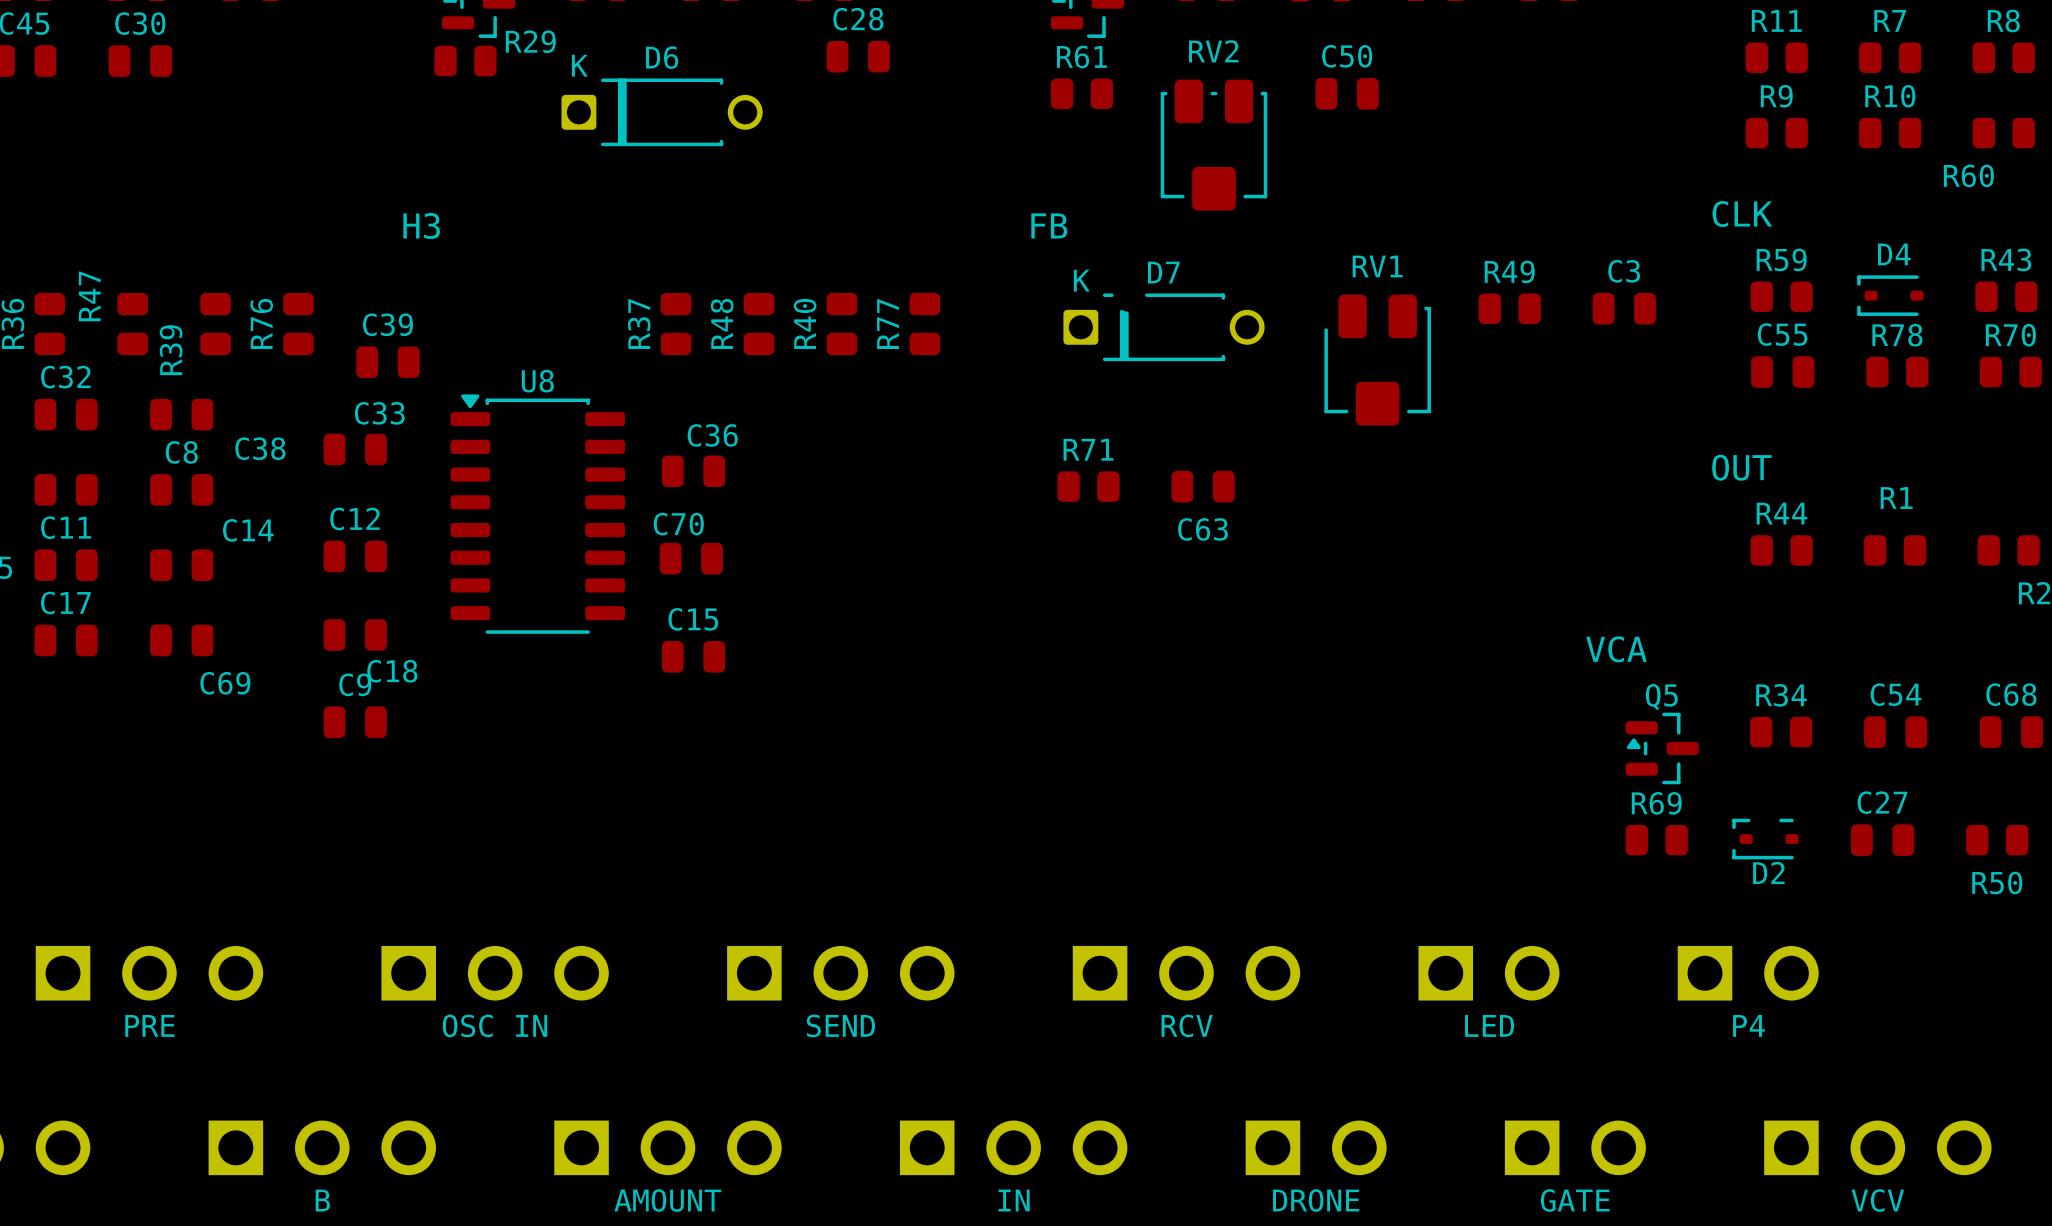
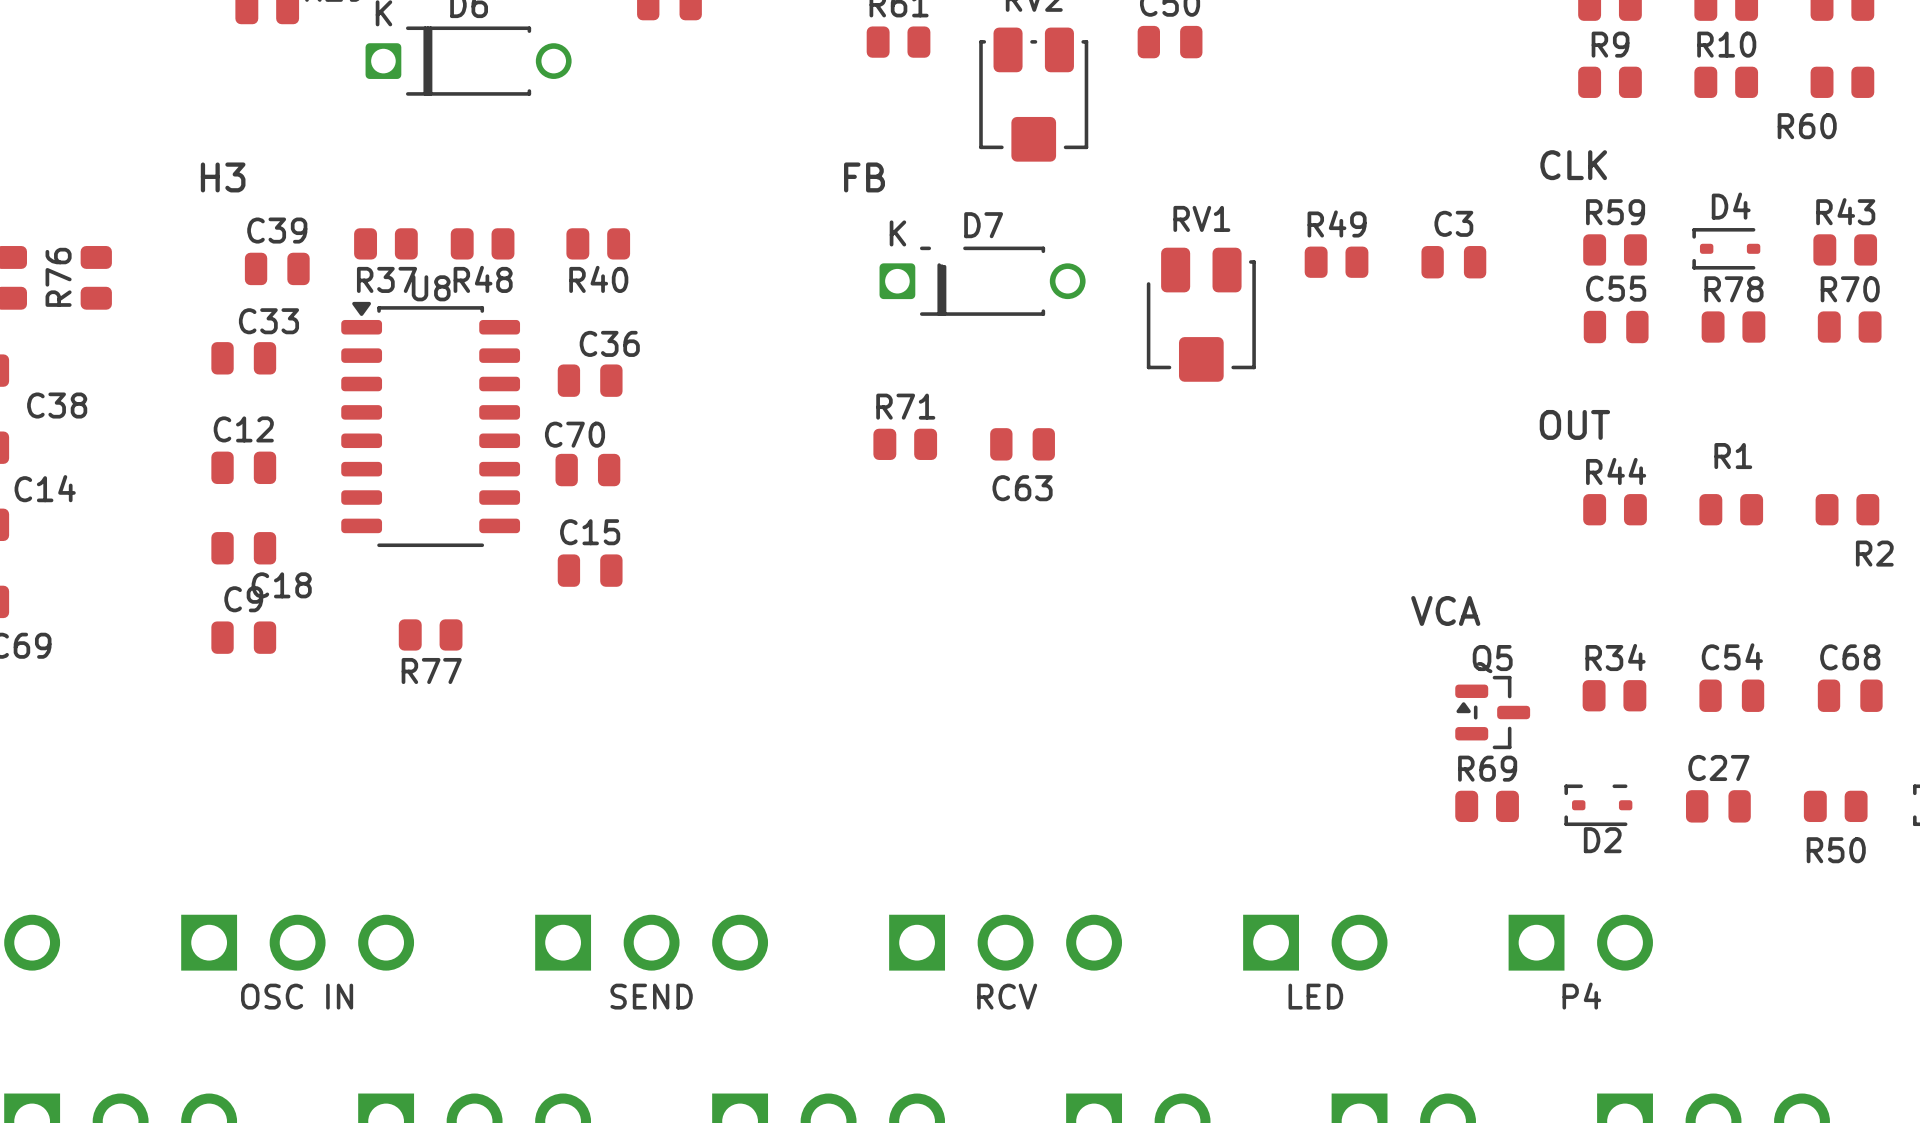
R48 name position: R48 (722, 323) -> R48 (483, 279)
R40 name position: R40 (805, 323) -> R40 (598, 279)
R37 name position: R37 (639, 324) -> R37 (387, 279)
R37 rotation: 0° (676, 324) -> 90° clockwise (385, 243)
R37 position: (676, 324) -> (385, 243)
R48 rotation: 0° (758, 324) -> 90° clockwise (482, 243)
R48 position: (758, 324) -> (482, 243)
R40 rotation: 0° (841, 324) -> 90° clockwise (598, 243)
R40 position: (841, 324) -> (598, 243)
R77 name position: R77 (888, 324) -> R77 (431, 671)
R77 rotation: 0° (924, 324) -> 90° clockwise (430, 634)
R77 position: (924, 324) -> (430, 634)
C39 position: (387, 362) -> (277, 268)
C33 position: (355, 449) -> (243, 358)
C36 position: (693, 471) -> (590, 380)
U8 position: (537, 514) -> (430, 424)
C12 position: (355, 556) -> (243, 467)
C70 position: (691, 558) -> (587, 470)
C18 position: (355, 635) -> (243, 548)
C15 position: (693, 656) -> (590, 570)
C9 position: (355, 722) -> (243, 637)

